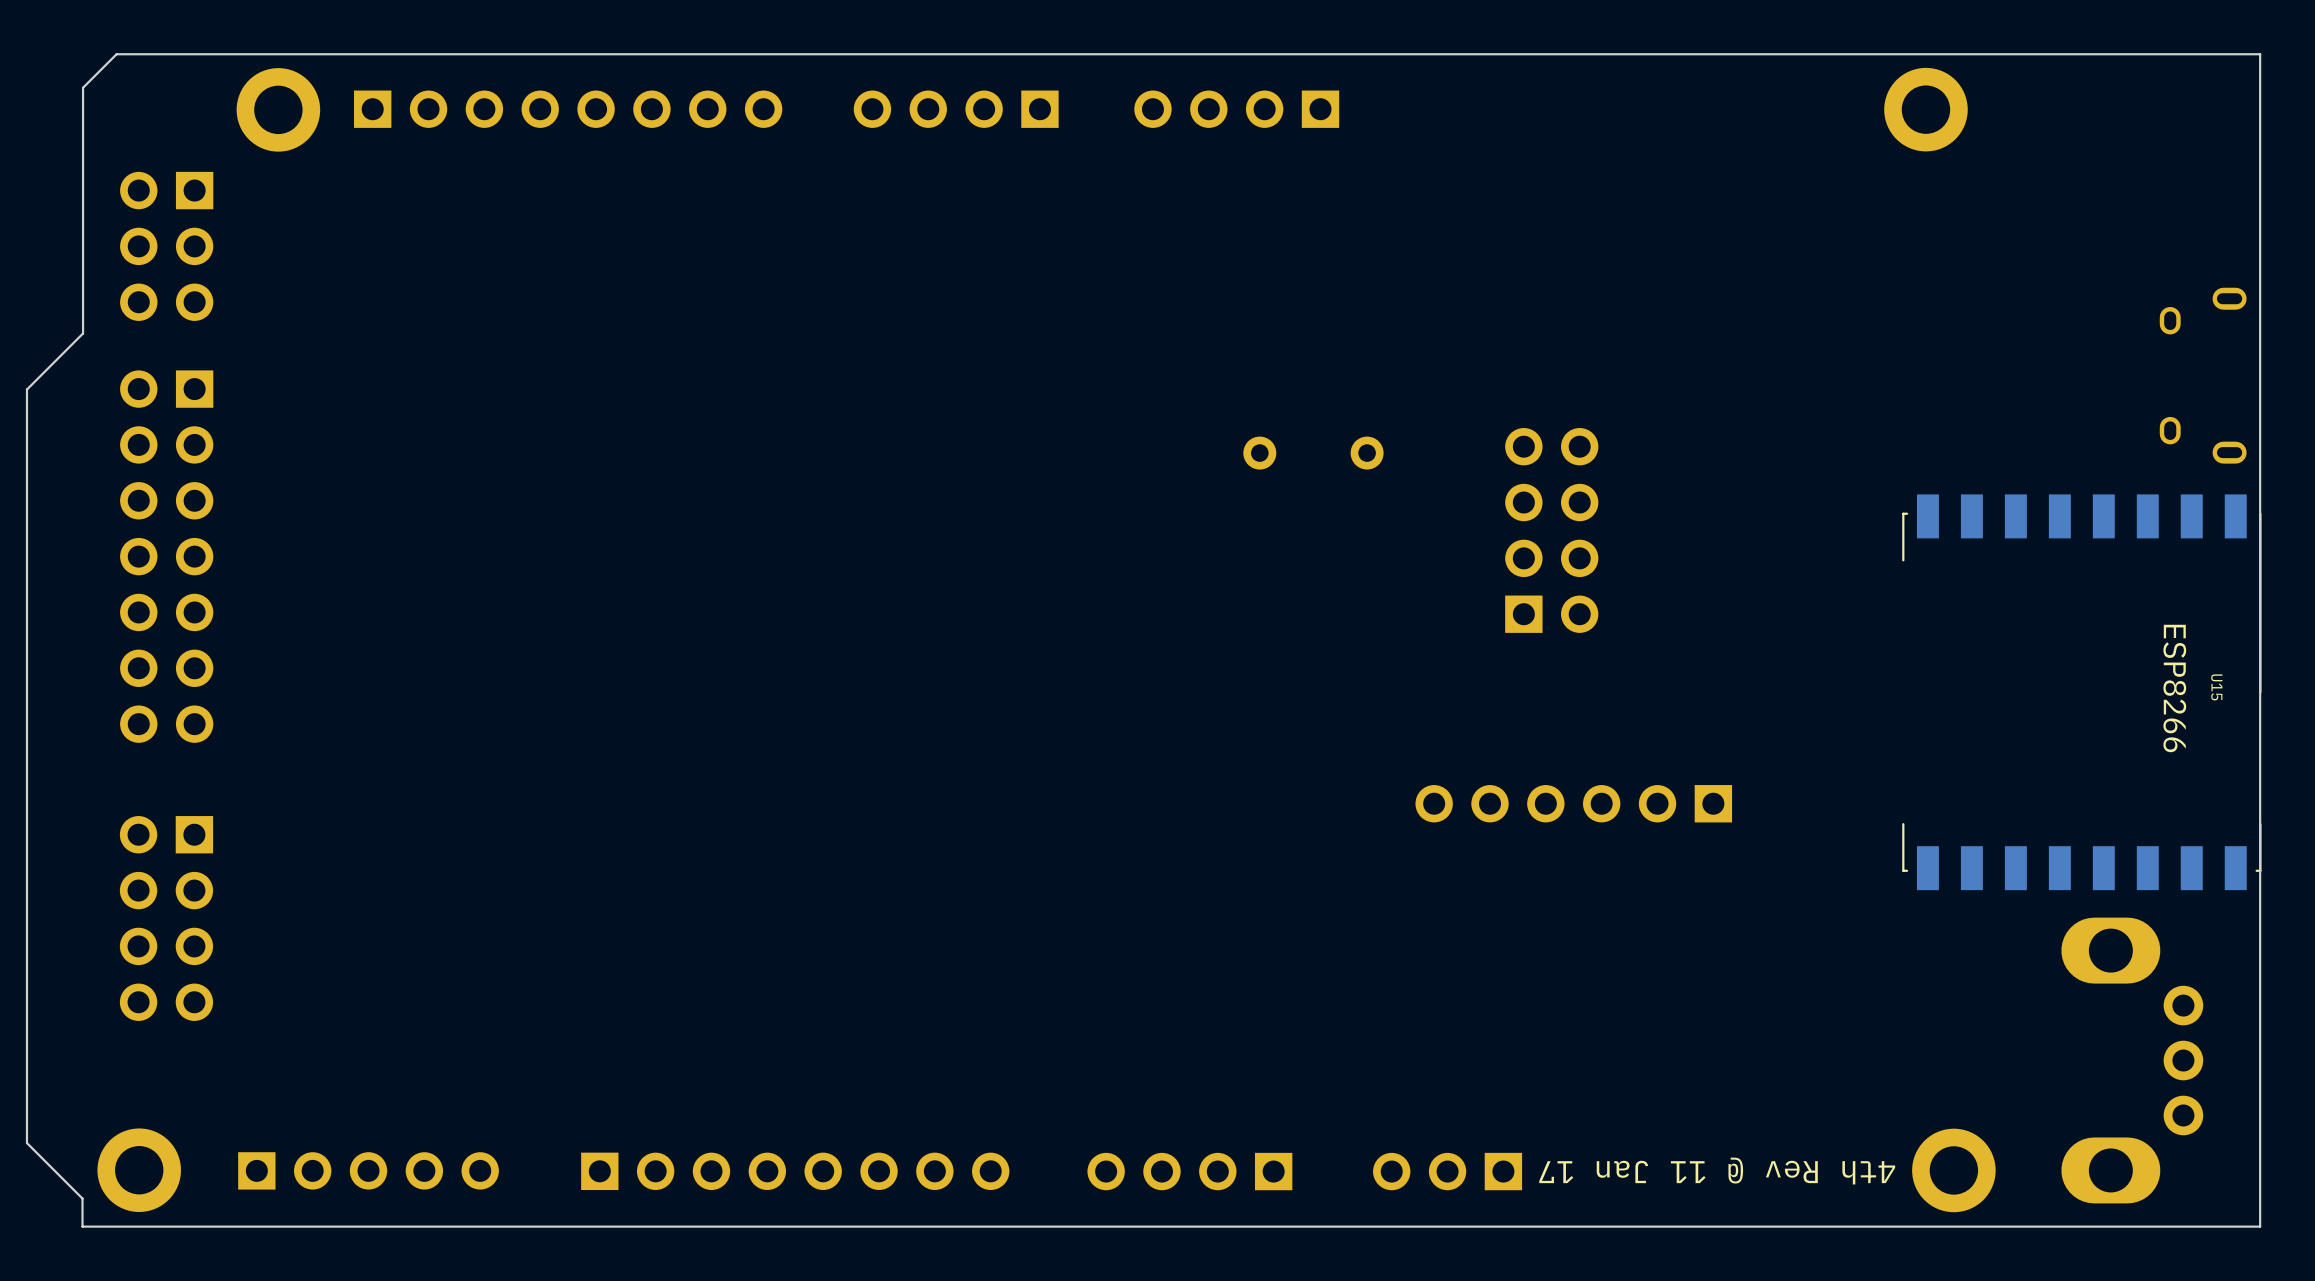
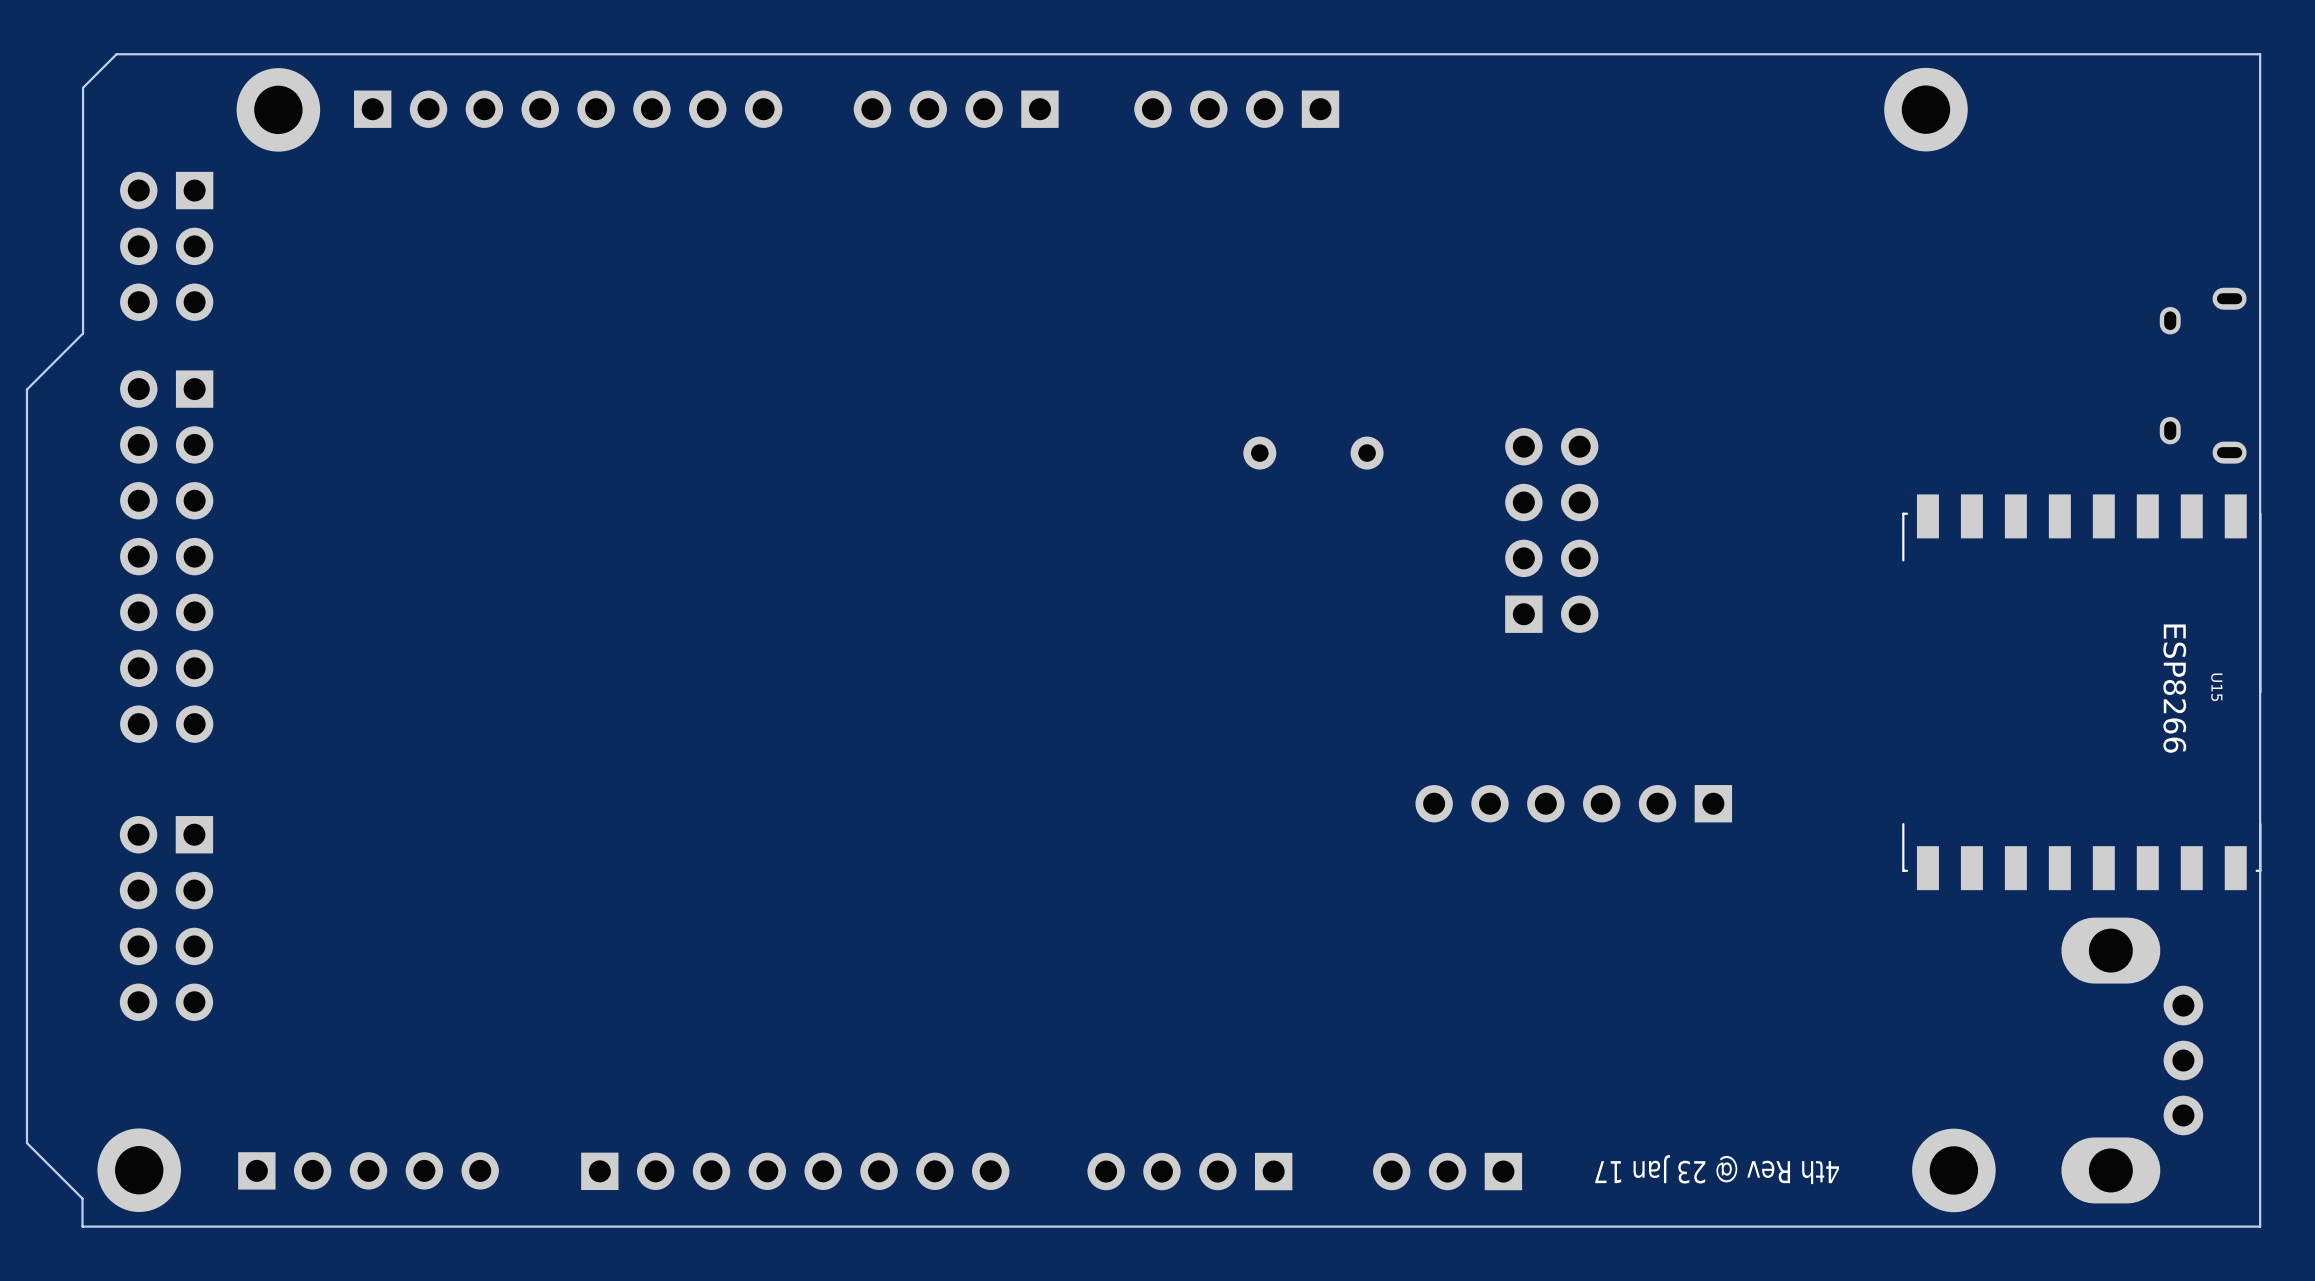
text: 4th Rev @ 11 Jan 17 (1717, 1171) -> 4th Rev @ 23 Jan 17 (1717, 1169)

